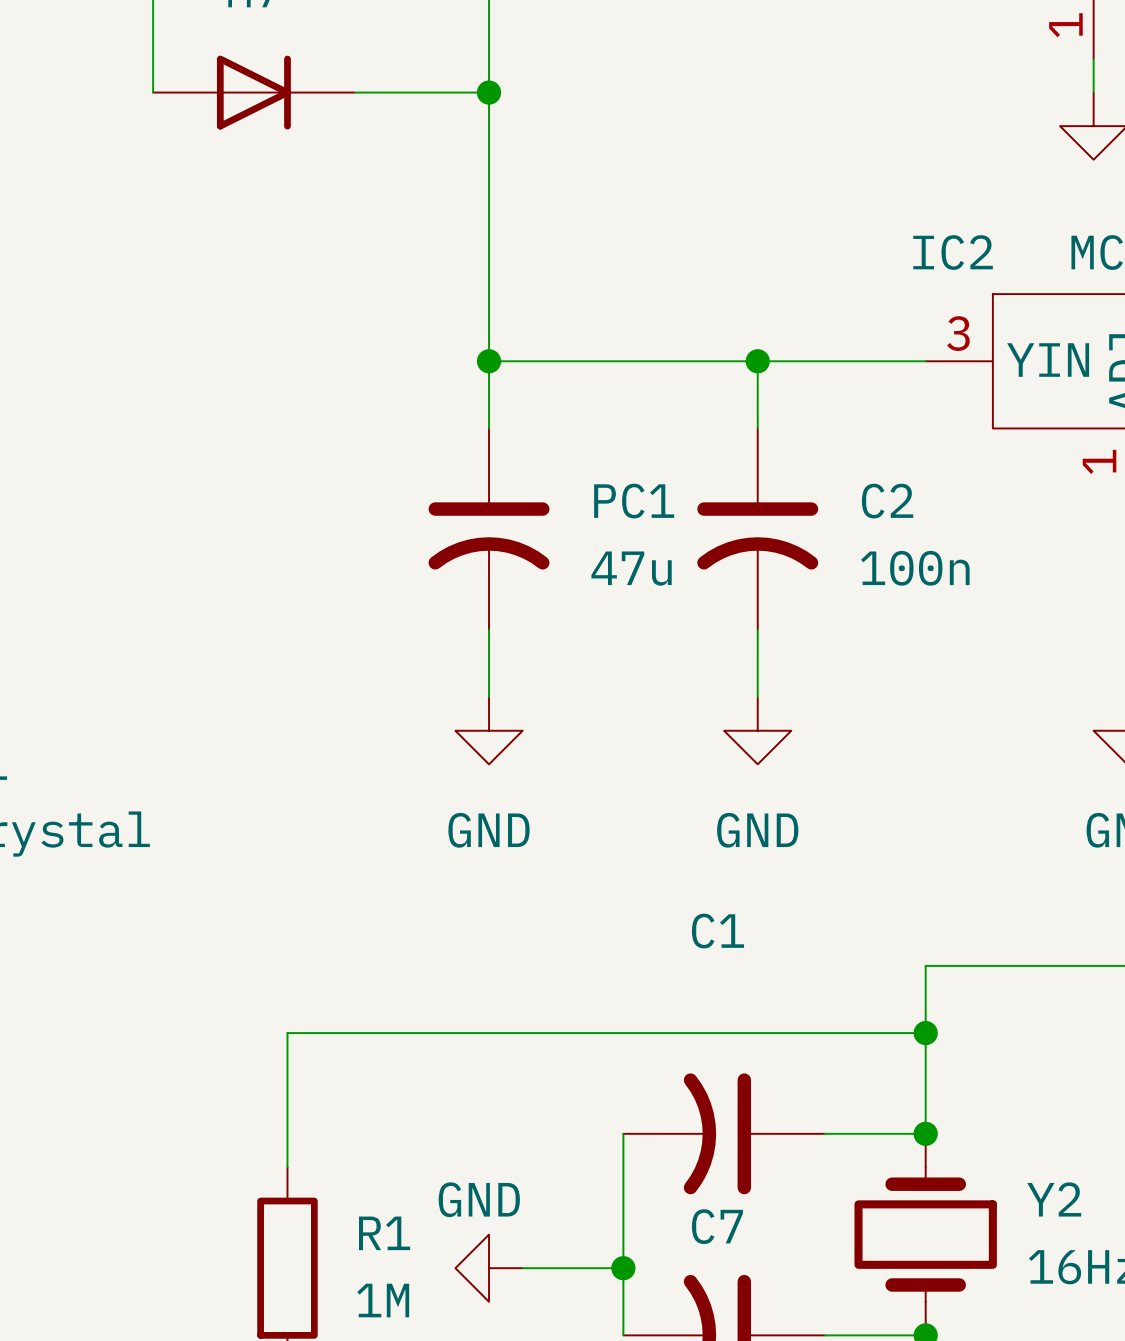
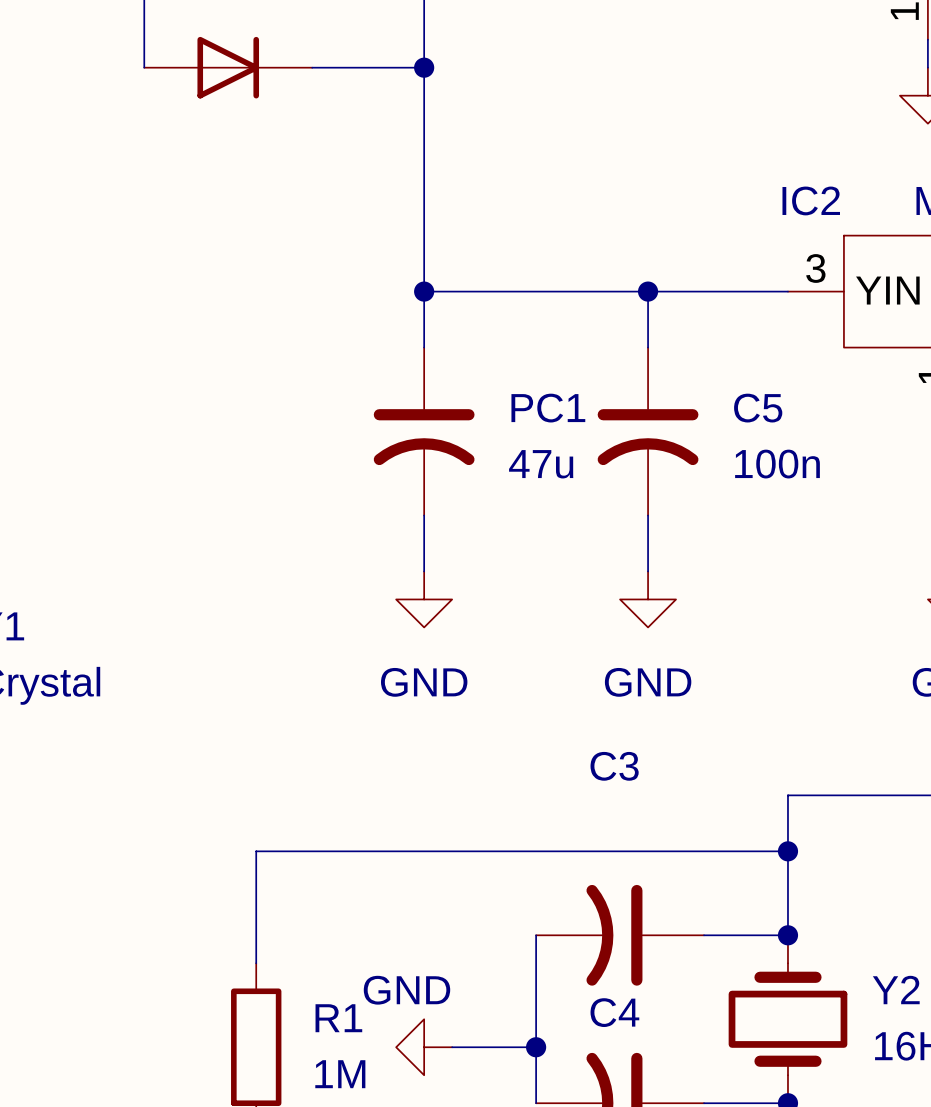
C2 name: C2 (887, 501) -> C5 (758, 408)
C1 name: C1 (717, 931) -> C3 (614, 766)
C7 name: C7 (717, 1226) -> C4 (614, 1012)

